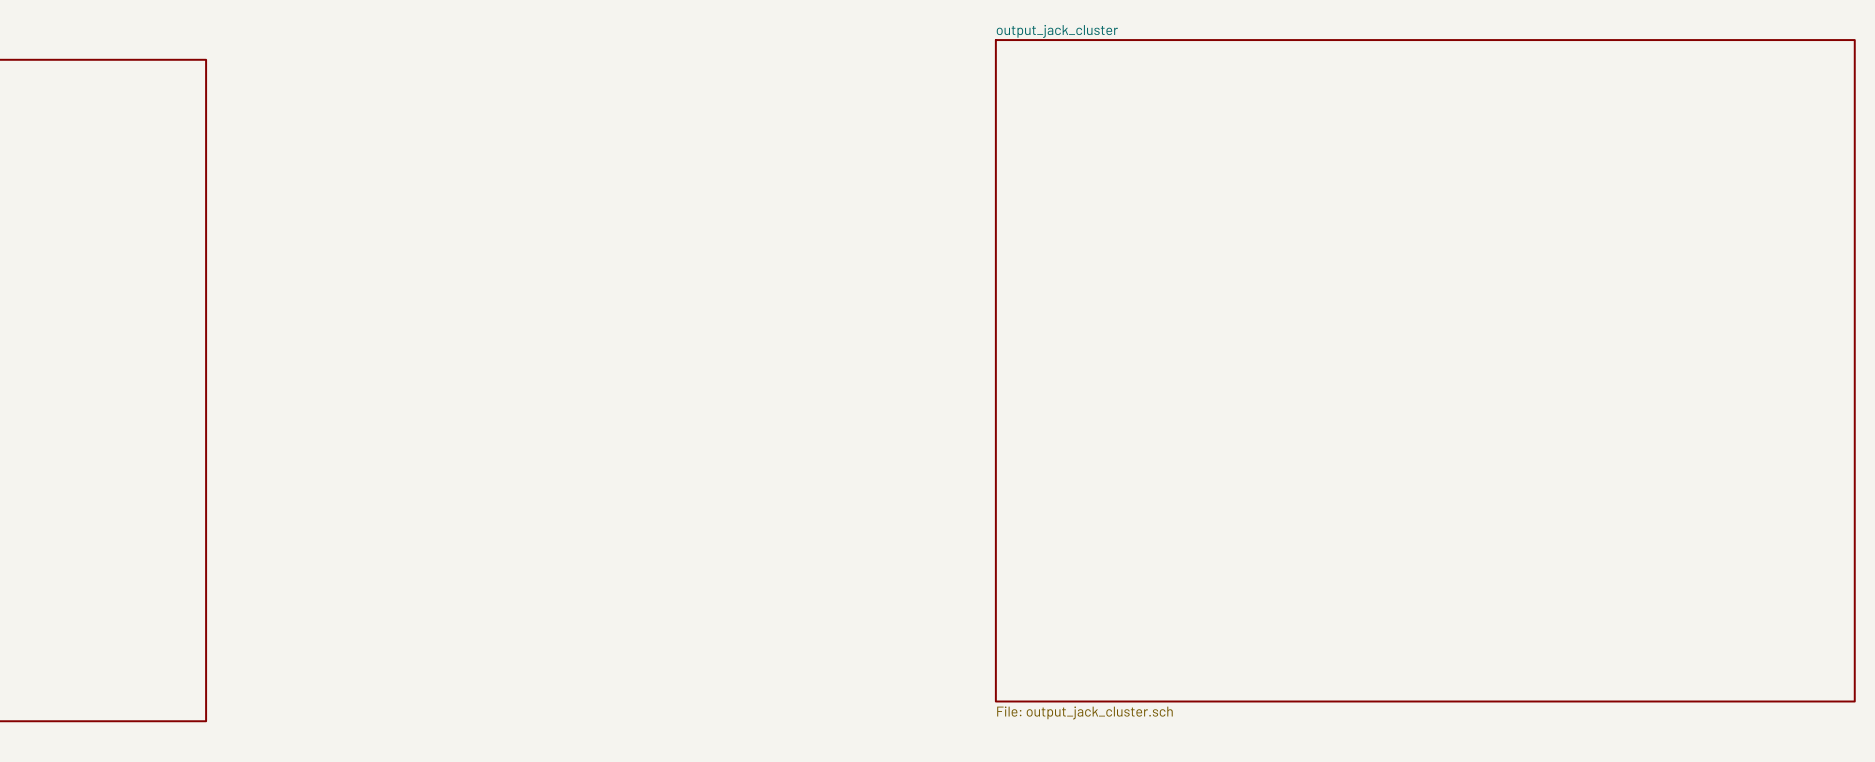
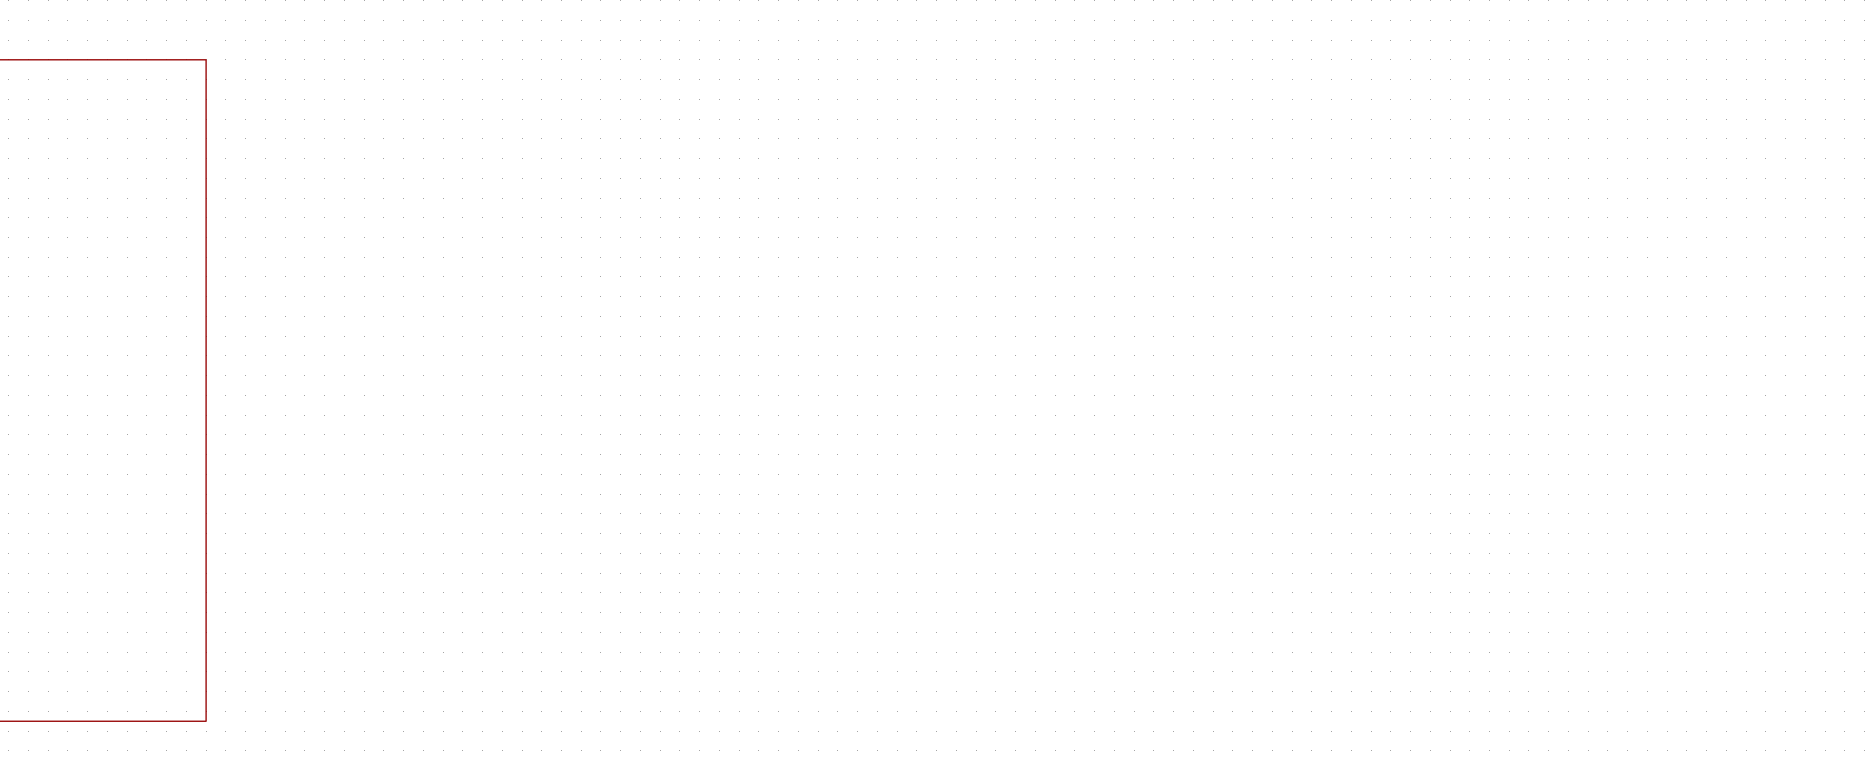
sheet output_jack_cluster: File: output_jack_cluster.sch (1425, 370) -> none

